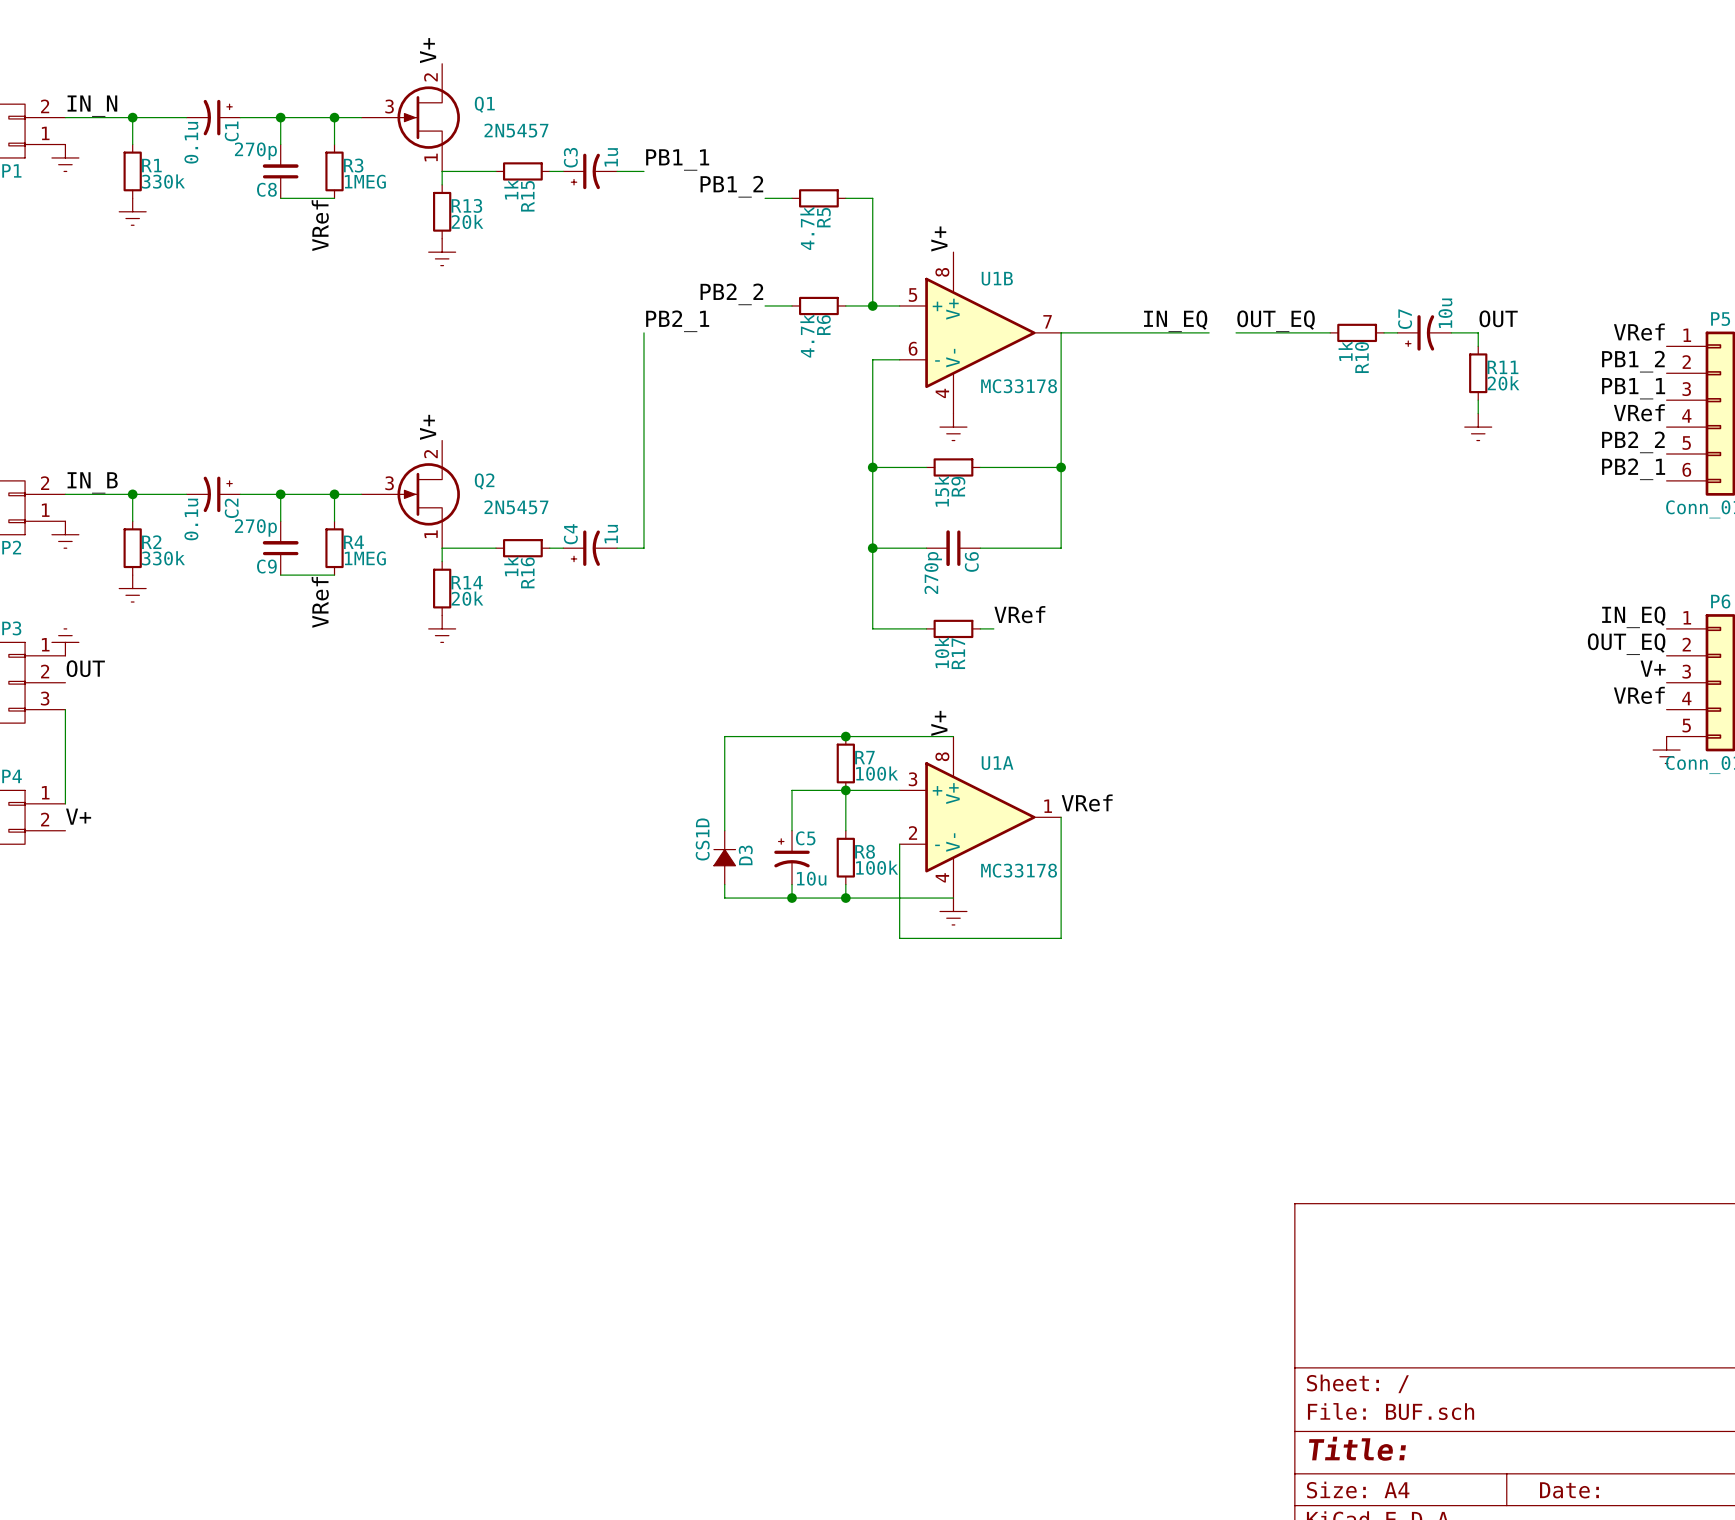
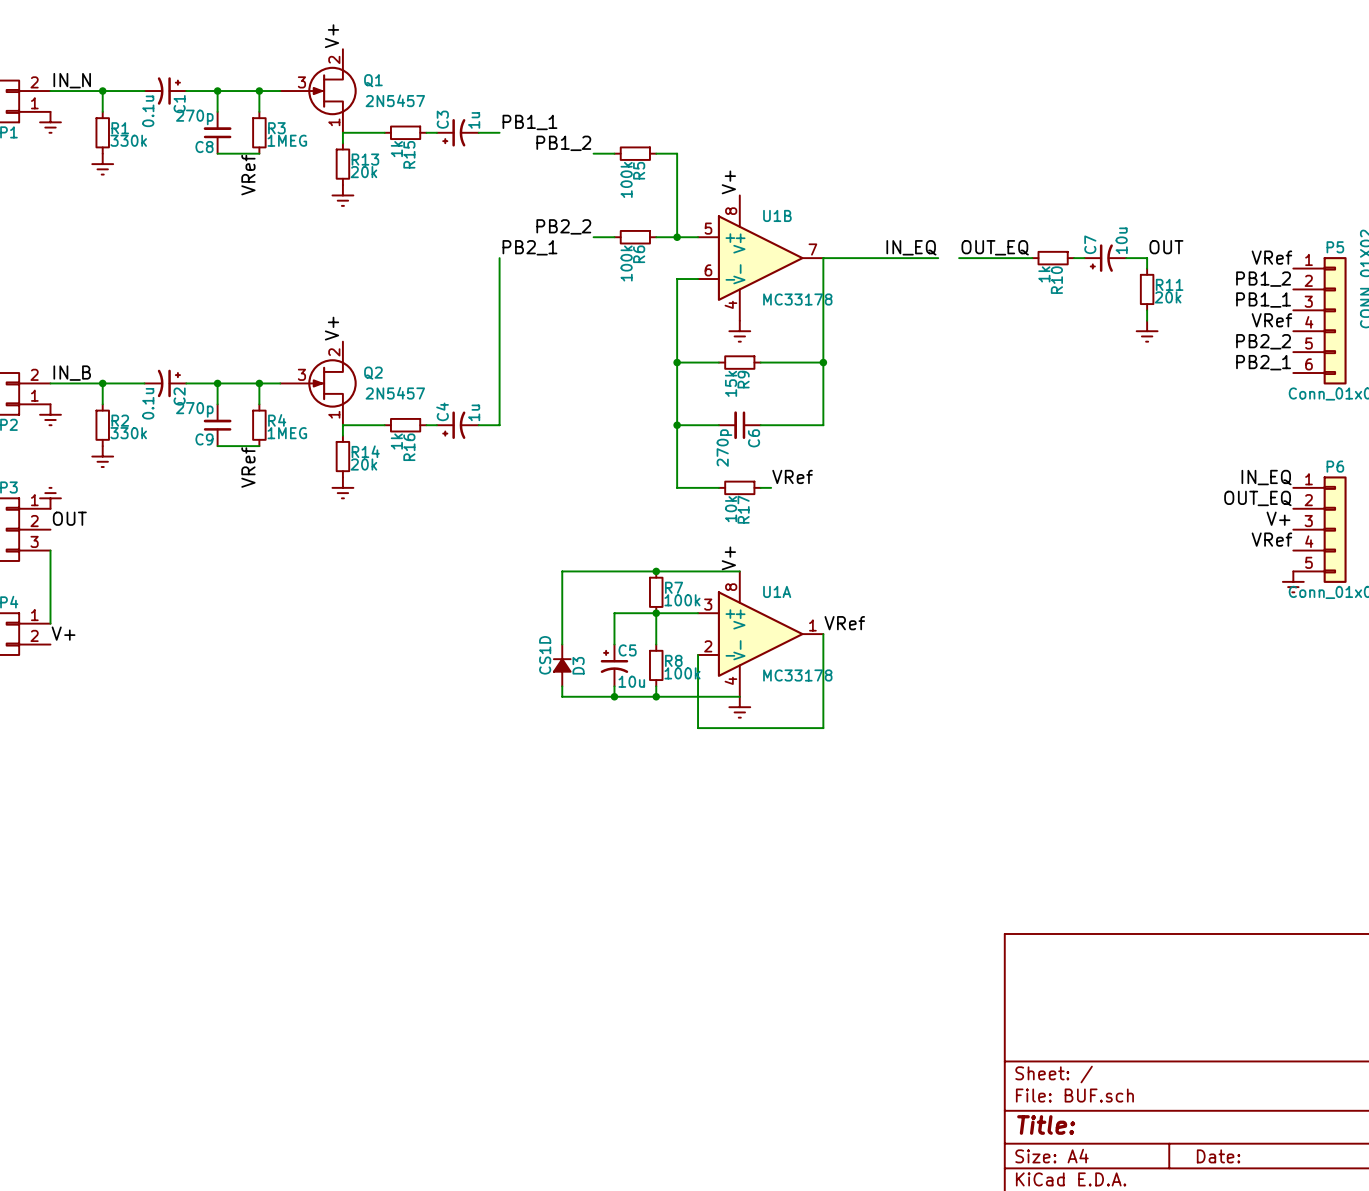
R5 value: 4.7k (807, 228) -> 100k (626, 179)
label position: IN_EQ (1175, 321) -> IN_EQ (911, 247)
R6 value: 4.7k (807, 335) -> 100k (626, 263)

